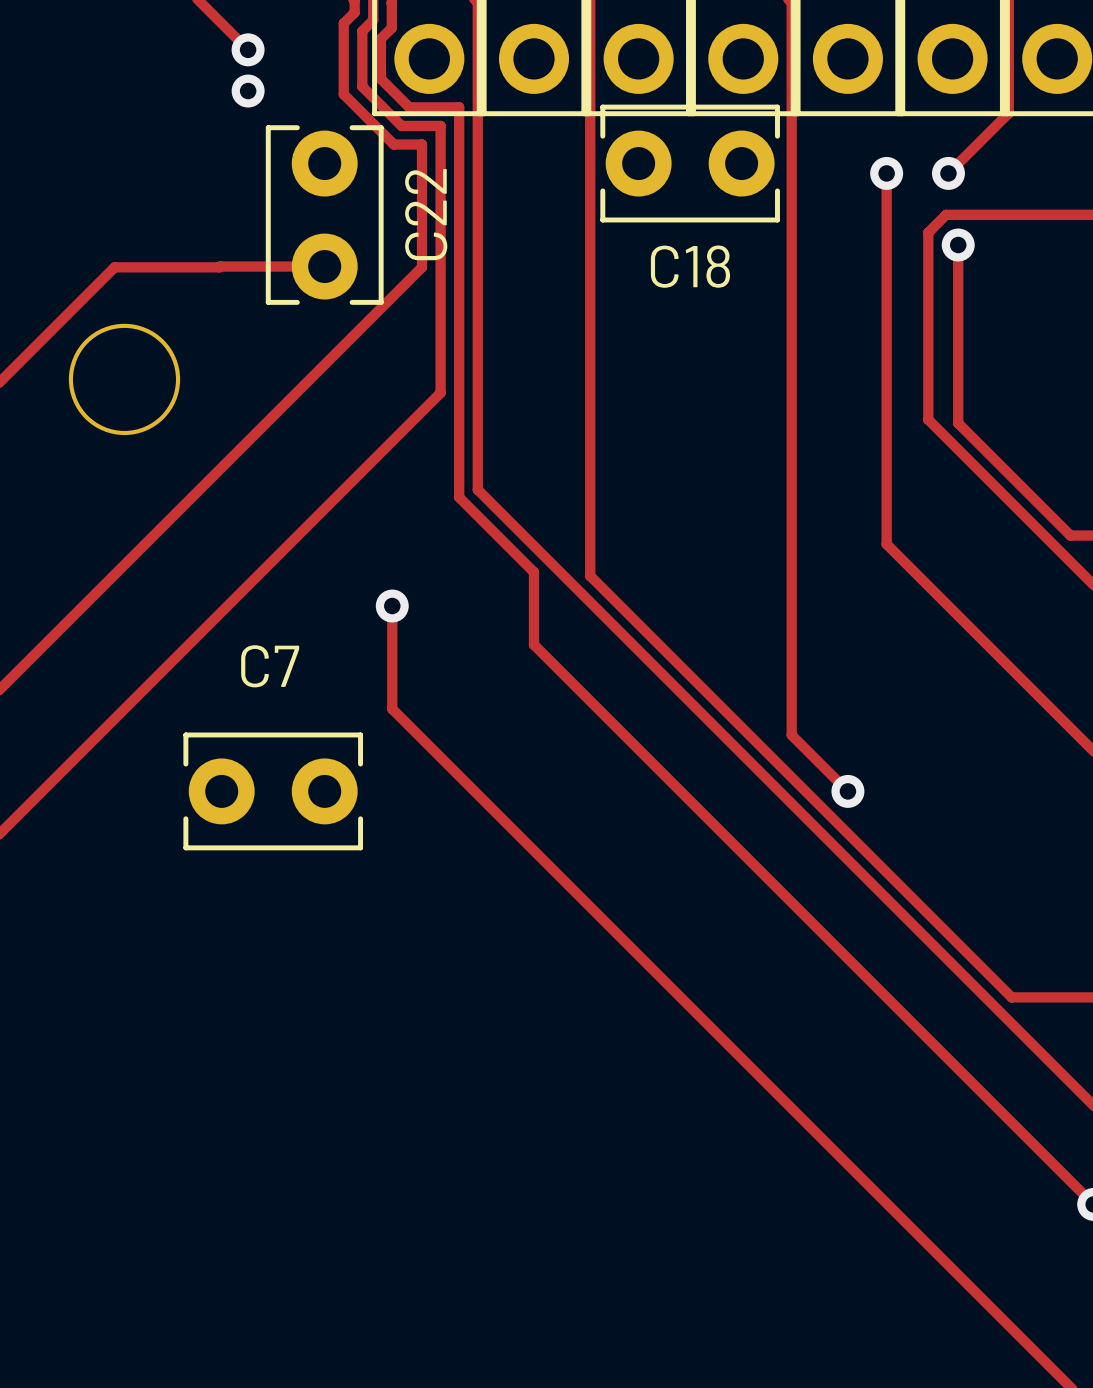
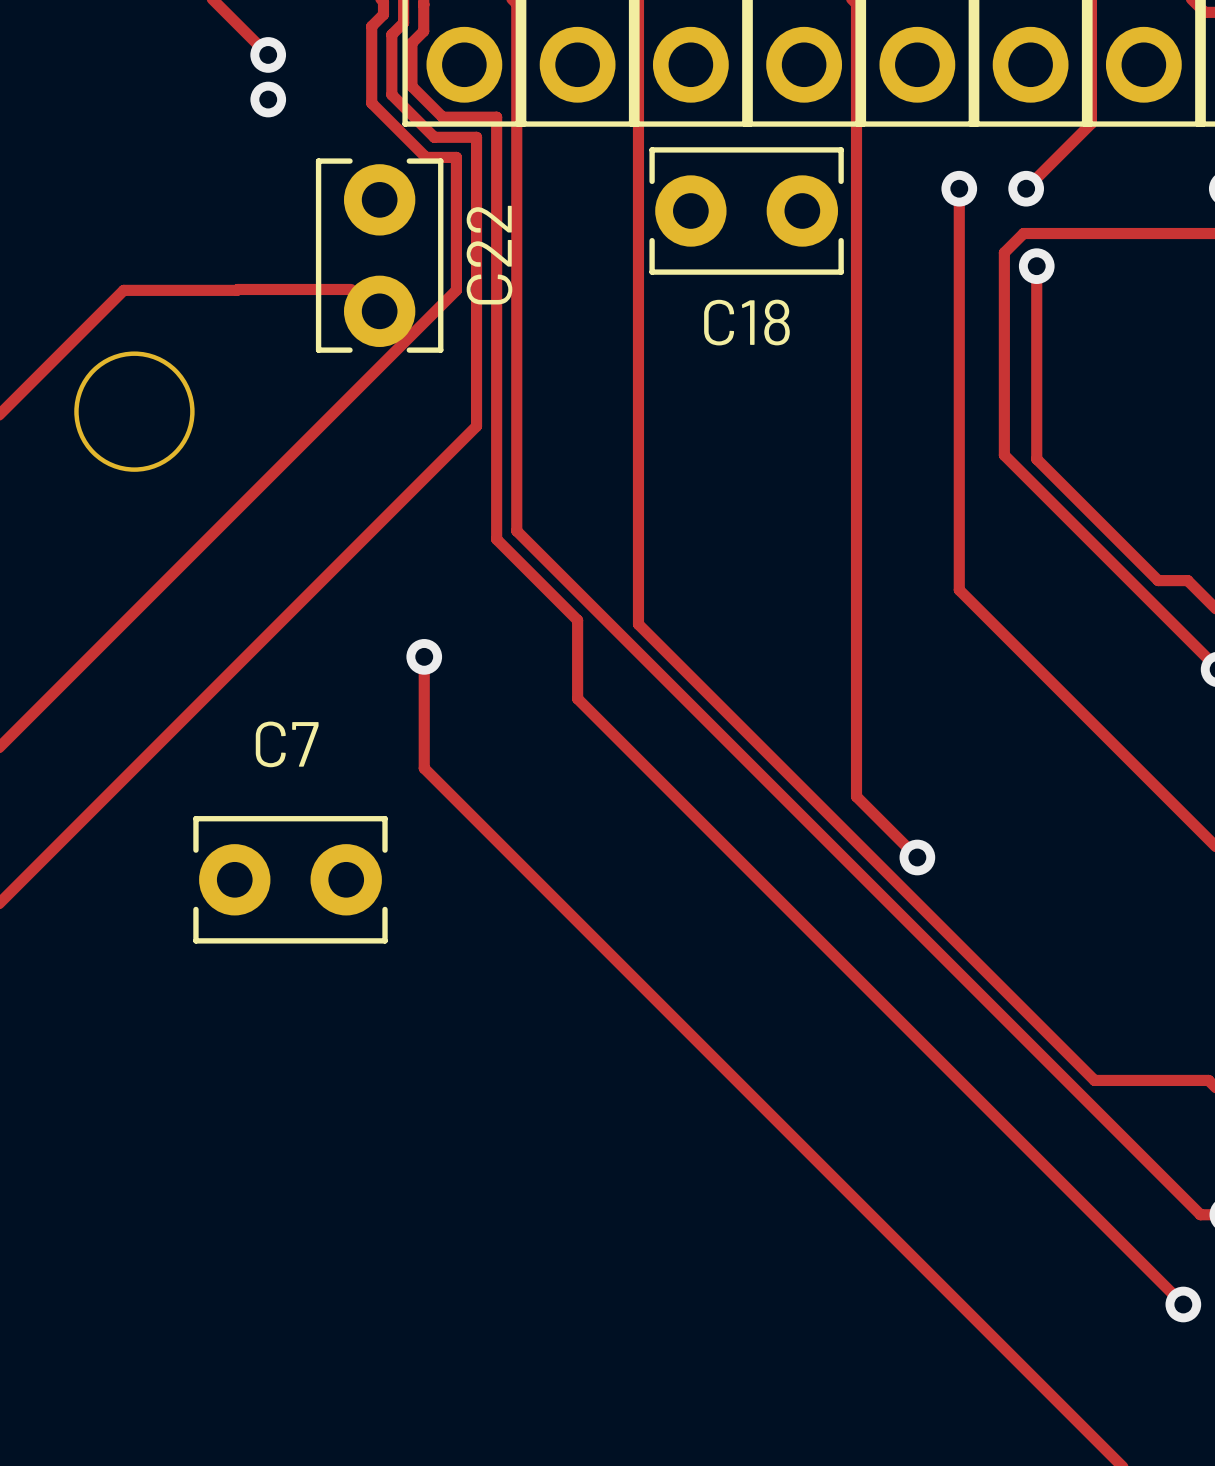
C18 position: (690, 163) -> (746, 211)
C22 position: (324, 215) -> (379, 255)
C7 position: (273, 791) -> (290, 879)

